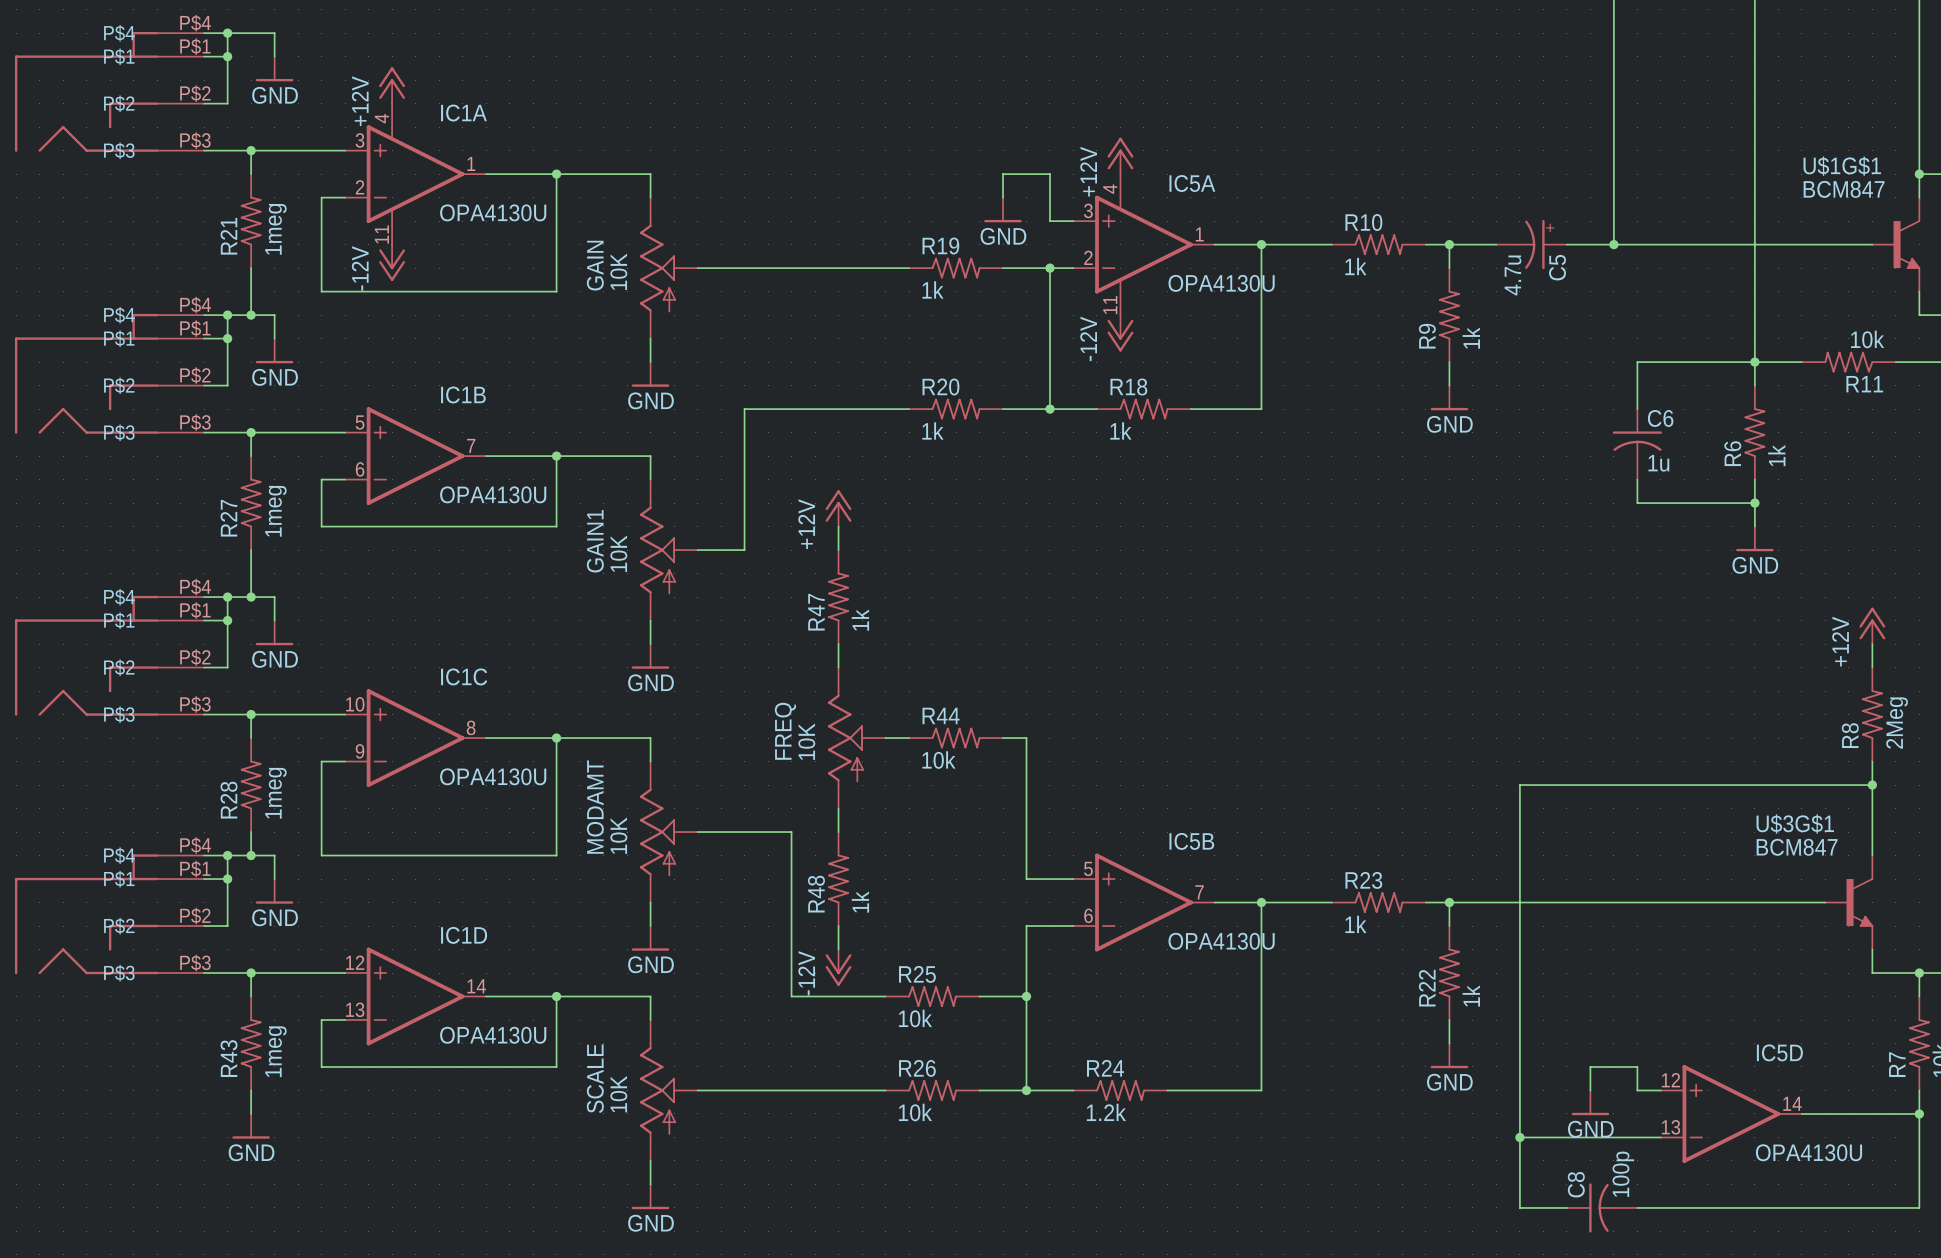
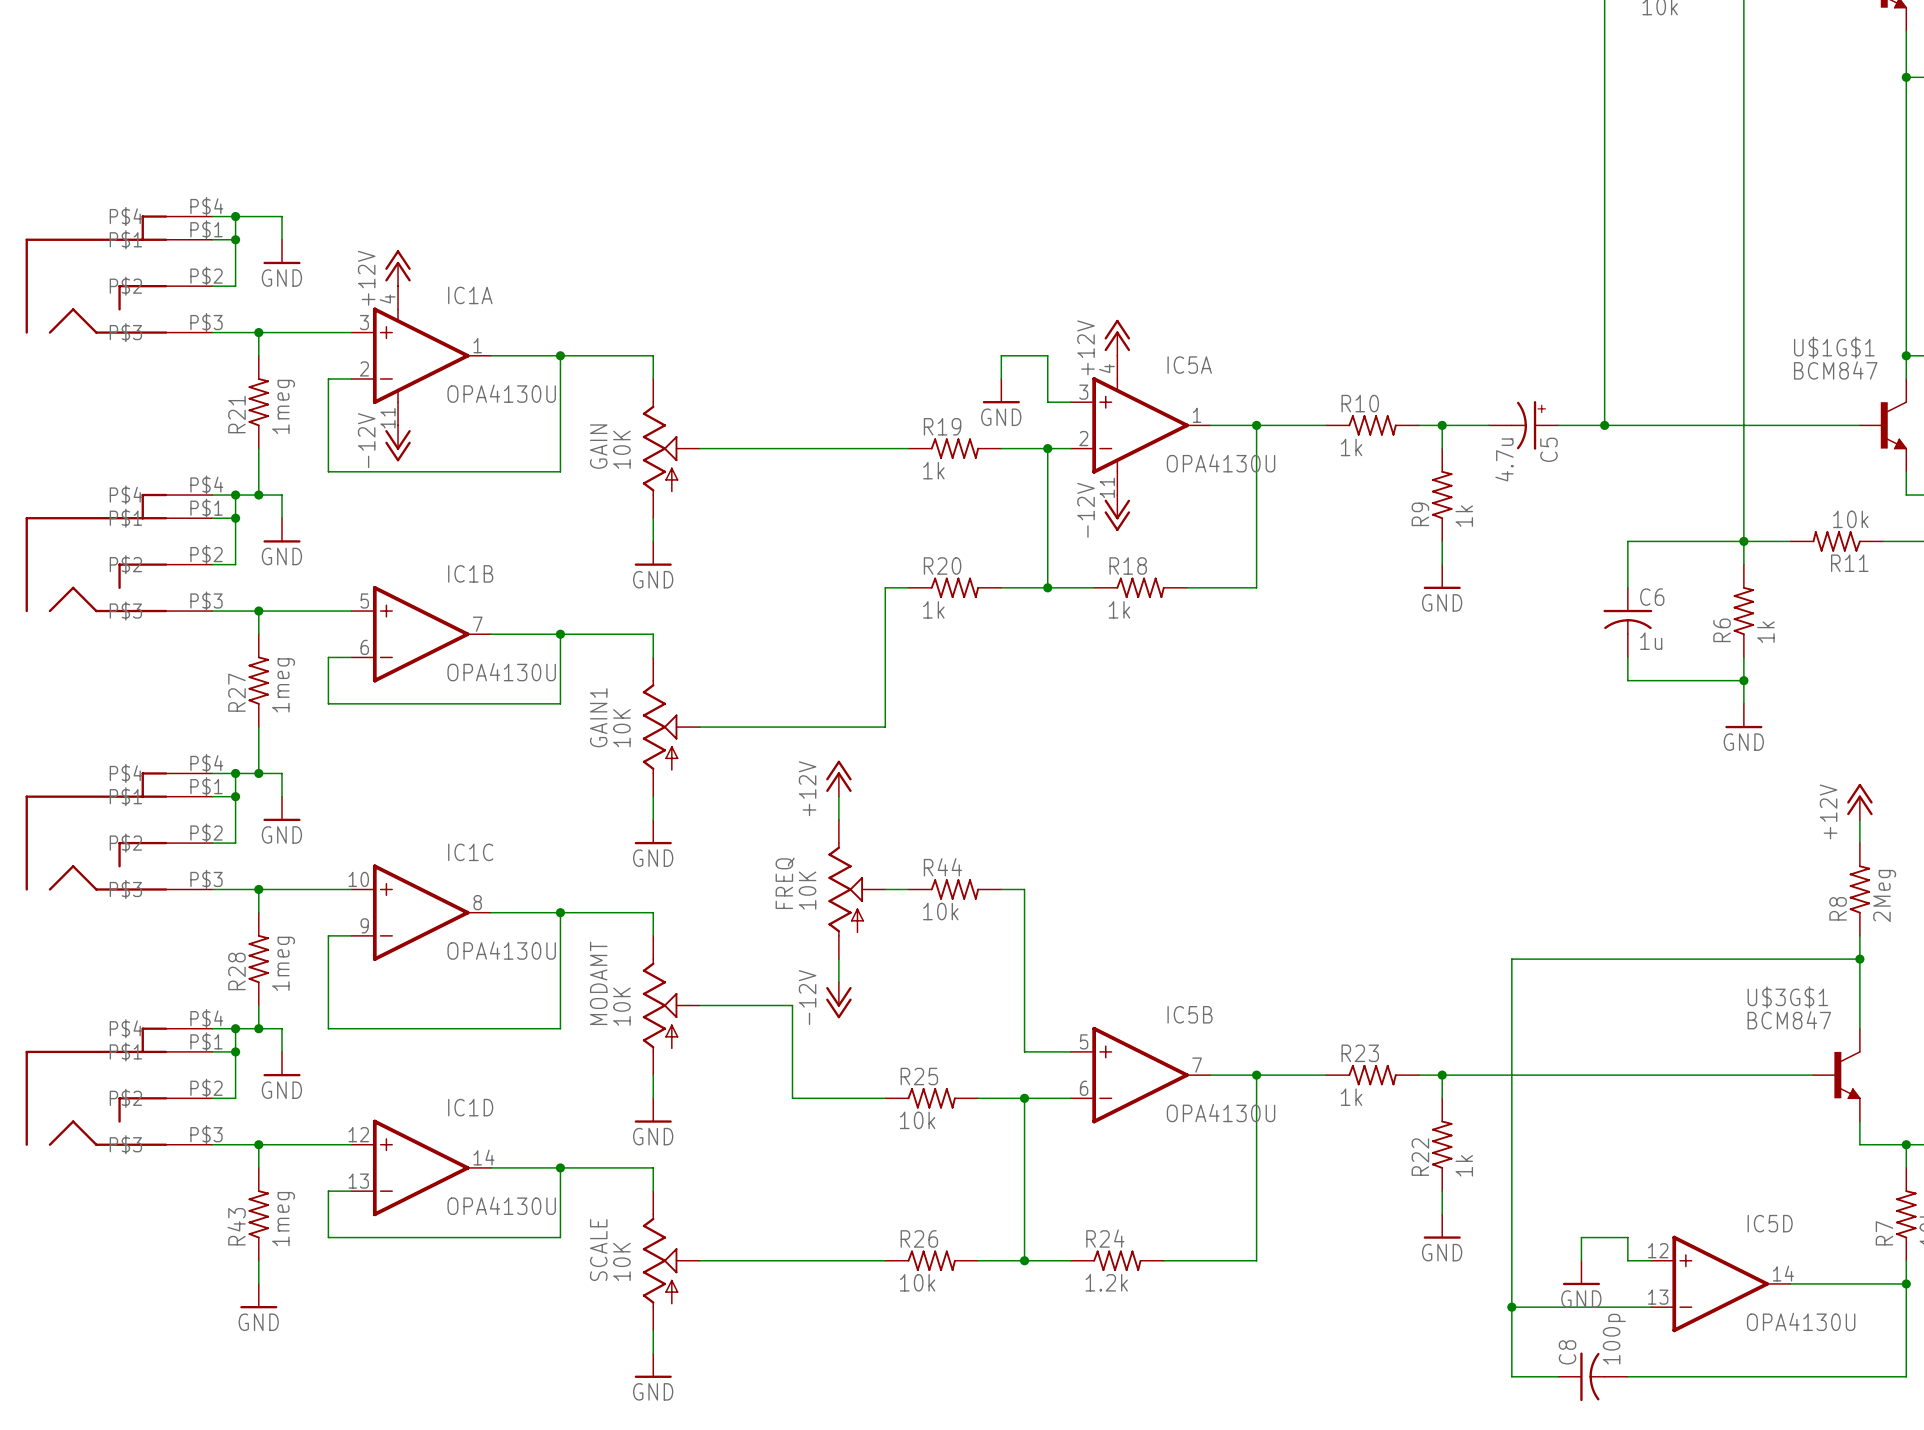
wire: (885, 409) (744, 409) (744, 550) -> (885, 587) (885, 727) (746, 727)
power symbol position: +12V (838, 508) -> +12V (838, 778)
wire: (838, 526) (838, 550) -> none
R47: 1k (838, 597) -> none
FREQ position: (856, 738) -> (856, 889)
wire: (885, 738) (909, 738) -> (885, 889) (908, 889)
R44 position: (956, 738) -> (954, 889)
wire: (1003, 738) (1026, 738) -> (1001, 889) (1024, 889) (1024, 912)
R48: 1k (838, 879) -> none
wire: (791, 926) (791, 996) (885, 996) -> (792, 1098) (885, 1098)
wire: (838, 926) (838, 949) -> none
junction: none -> (1024, 1098)
power symbol position: -12V (838, 967) -> -12V (838, 1000)
R25 position: (932, 996) -> (931, 1098)
wire: (979, 996) (1026, 996) -> (978, 1098) (1024, 1098)
junction: (1026, 996) -> none

